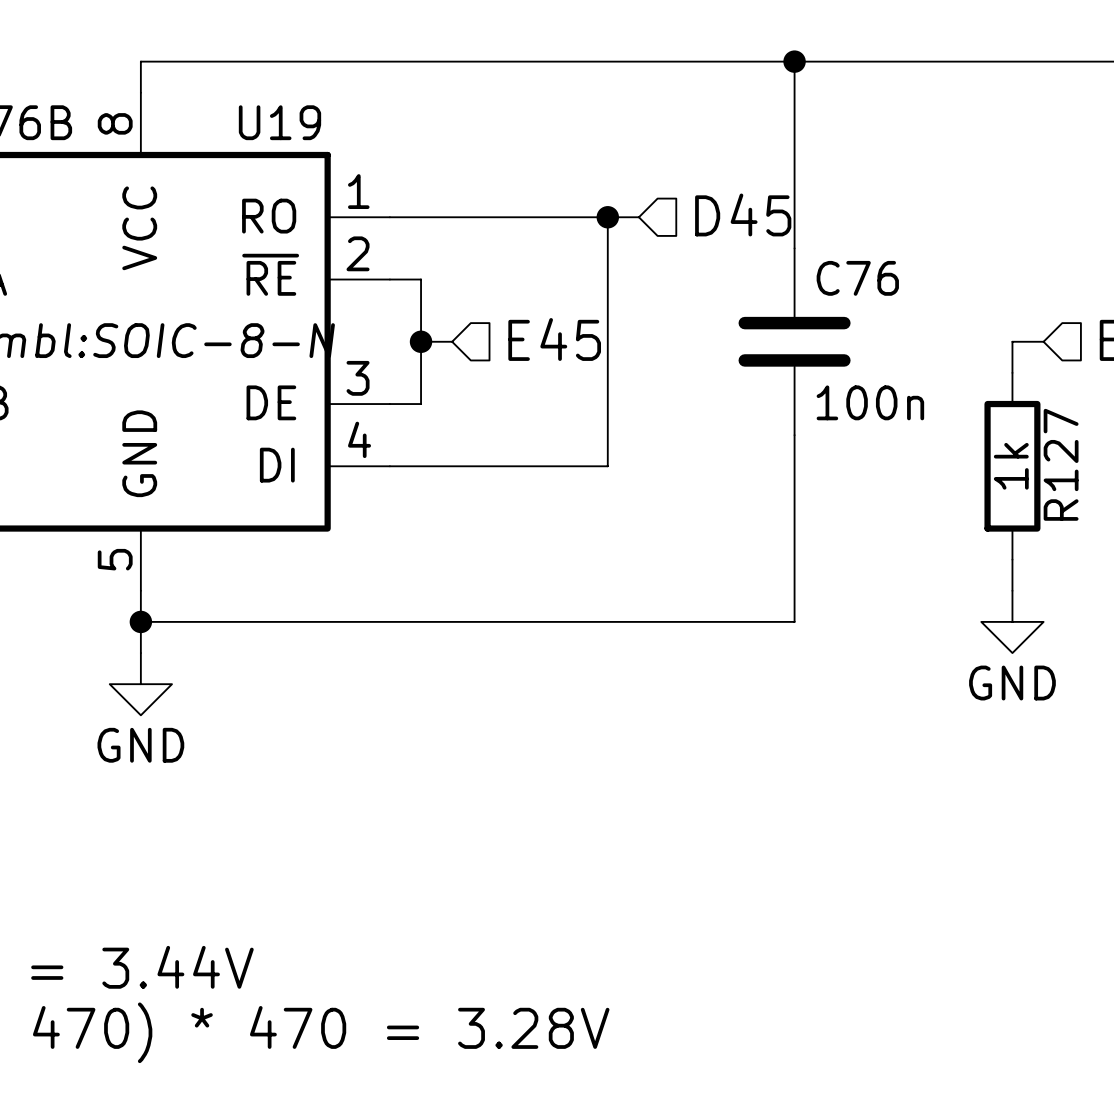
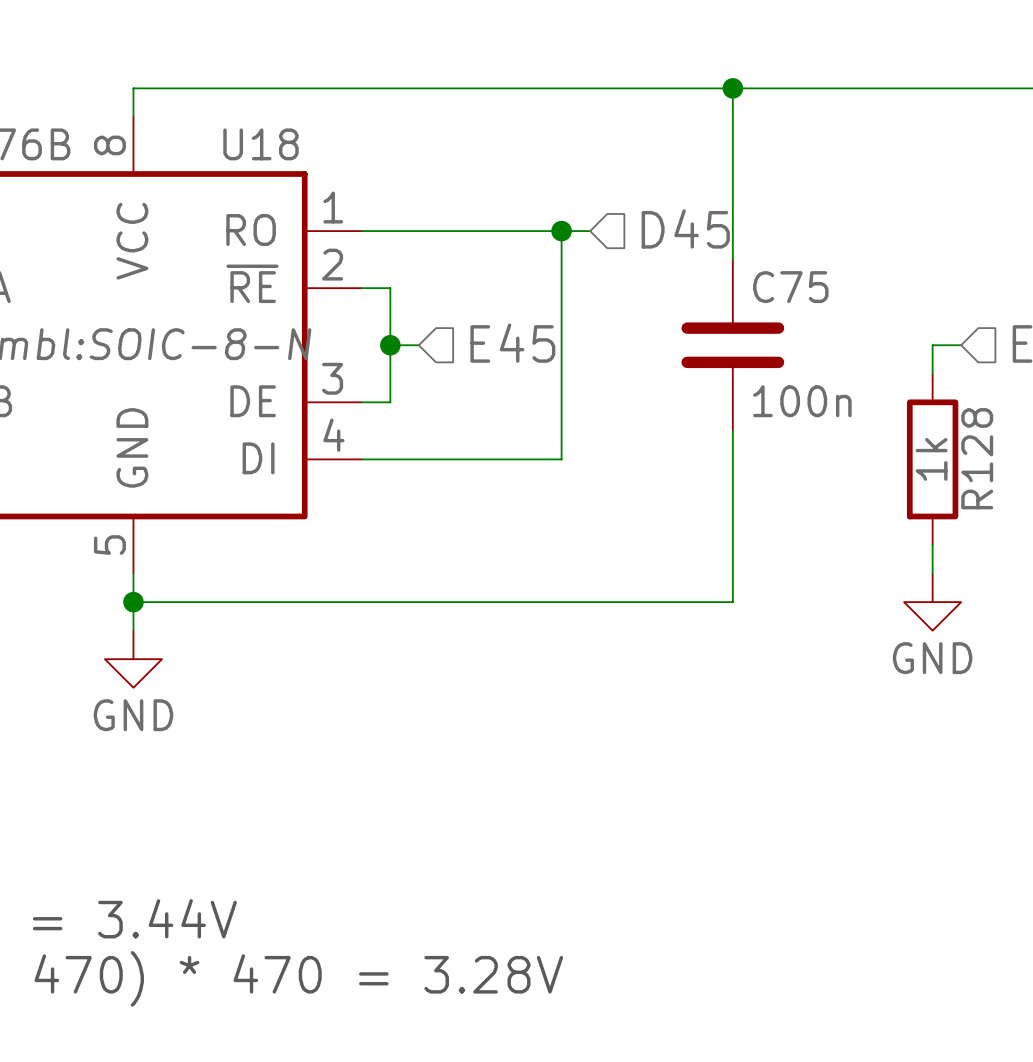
U19 name: U19 (279, 122) -> U18 (261, 144)
C76 name: C76 (857, 278) -> C75 (790, 287)
R127 name: R127 (1061, 464) -> R128 (977, 458)

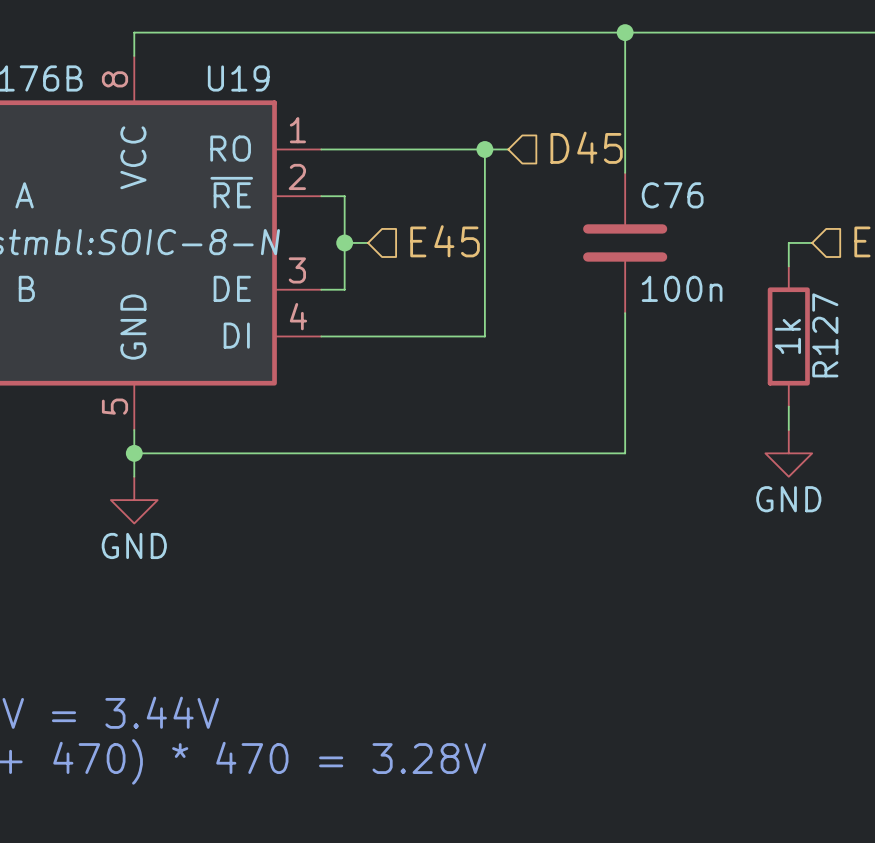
U18 name: U18 (261, 144) -> U19 (238, 78)
C75 name: C75 (790, 287) -> C76 (672, 195)
R128 name: R128 (977, 458) -> R127 (825, 335)

